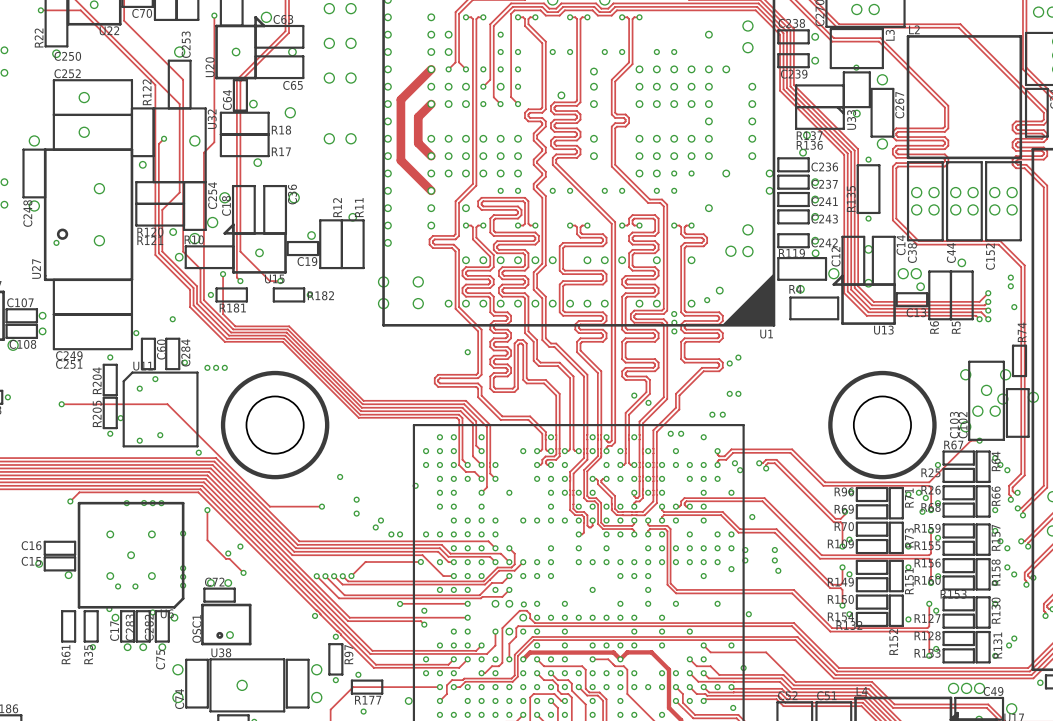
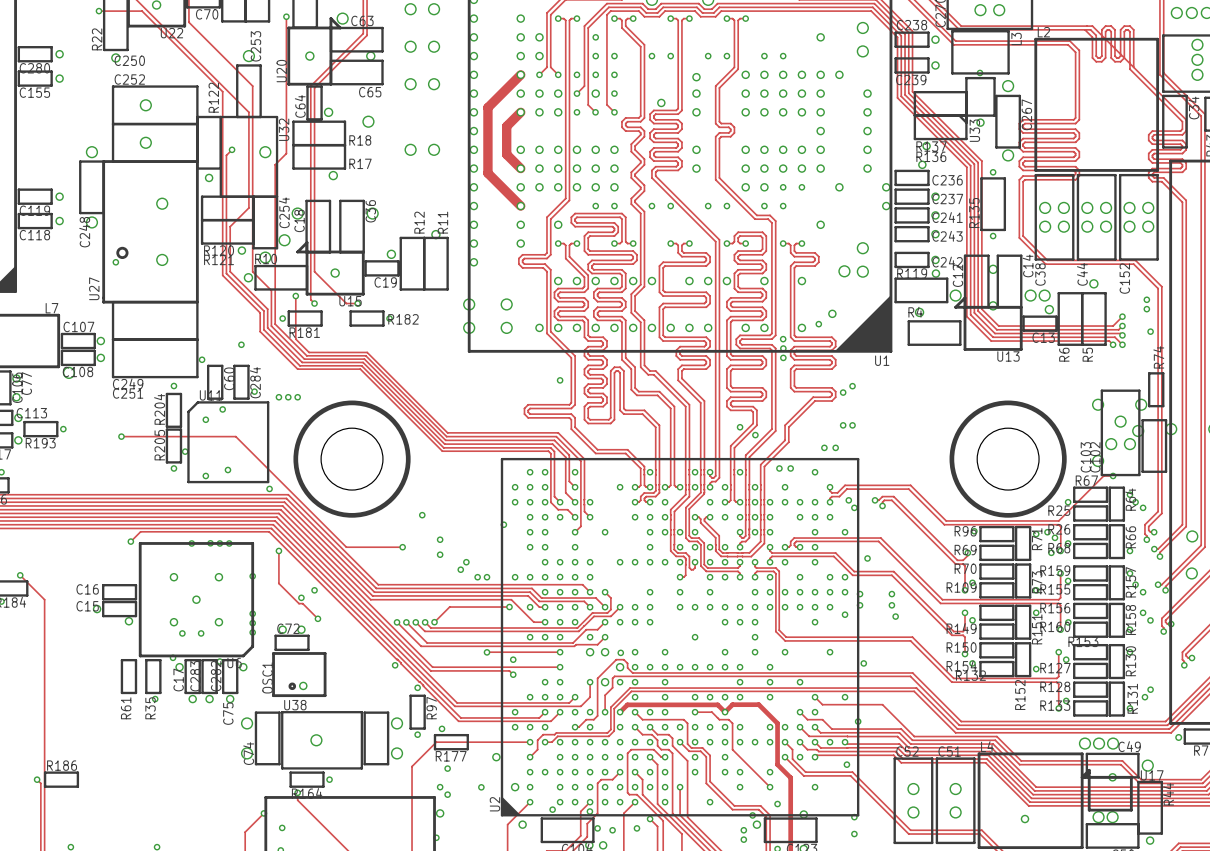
track: none -> (1084, 29) (1092, 37) (1092, 57) (1096, 61) (1101, 61) (1105, 57) (1105, 31) (1107, 29) (1111, 31) (1111, 57) (1114, 61) (1120, 61) (1124, 57) (1124, 31) (1128, 29) (1129, 31) (1129, 69)
track: (963, 32) (995, 64) -> (1096, 35) (1096, 56) (1099, 57) (1101, 56) (1101, 29) (1105, 26) (1111, 26) (1114, 29) (1114, 56) (1118, 57) (1120, 56) (1120, 29) (1124, 26) (1129, 26) (1133, 29) (1133, 67)
track: (880, 38) (948, 105) -> (1006, 41) (1069, 41) (1079, 50) (1079, 114)
track: (878, 41) (944, 107) -> (1004, 44) (1068, 44) (1075, 52) (1075, 116)
track: (944, 109) (944, 124) -> (1075, 117) (1073, 119) (1023, 119) (1019, 123) (1019, 129) (1023, 132) (1073, 132) (1075, 134)
track: (948, 111) (948, 123) -> (1079, 119) (1075, 123) (1024, 123) (1023, 125) (1024, 129) (1075, 129) (1079, 132)

